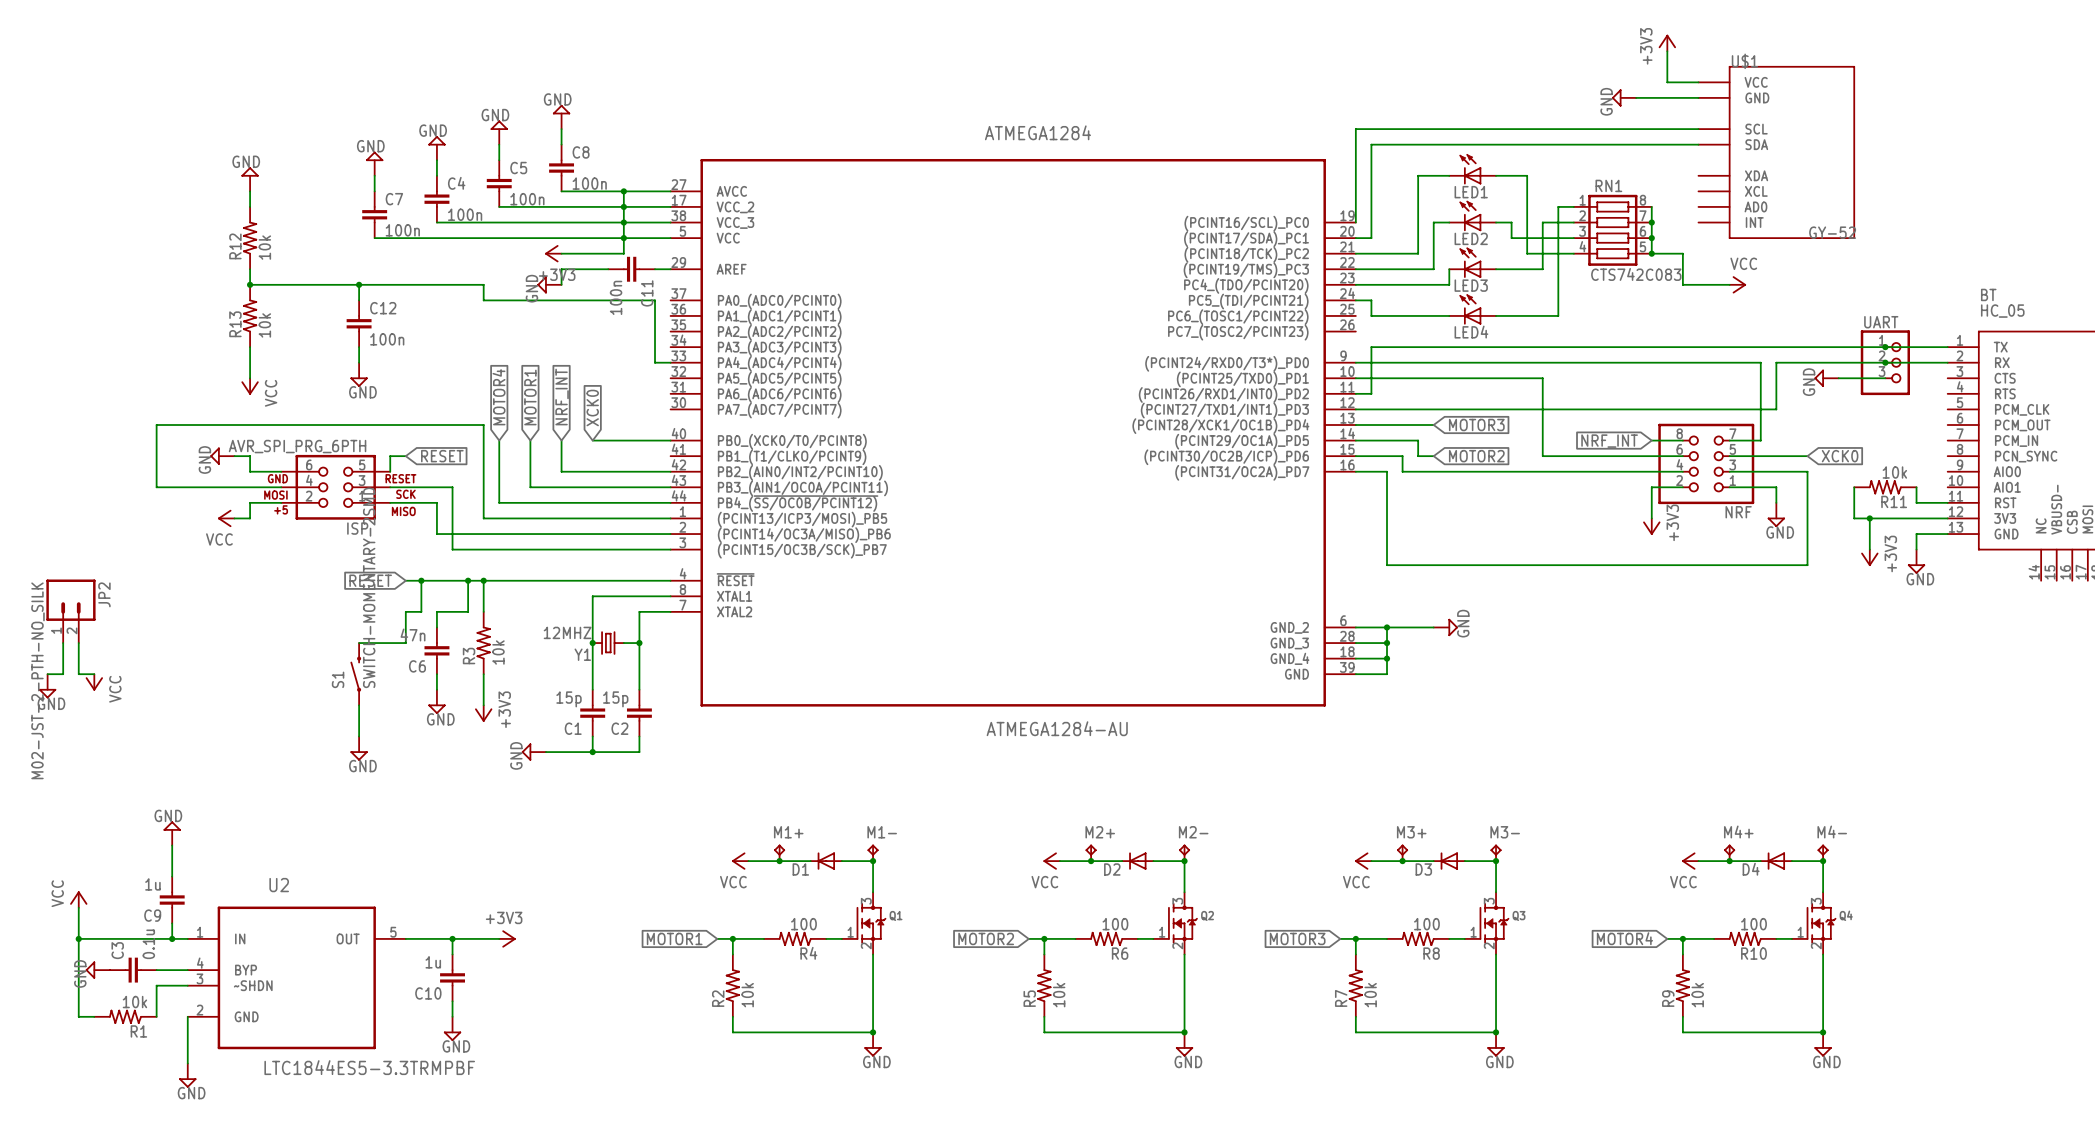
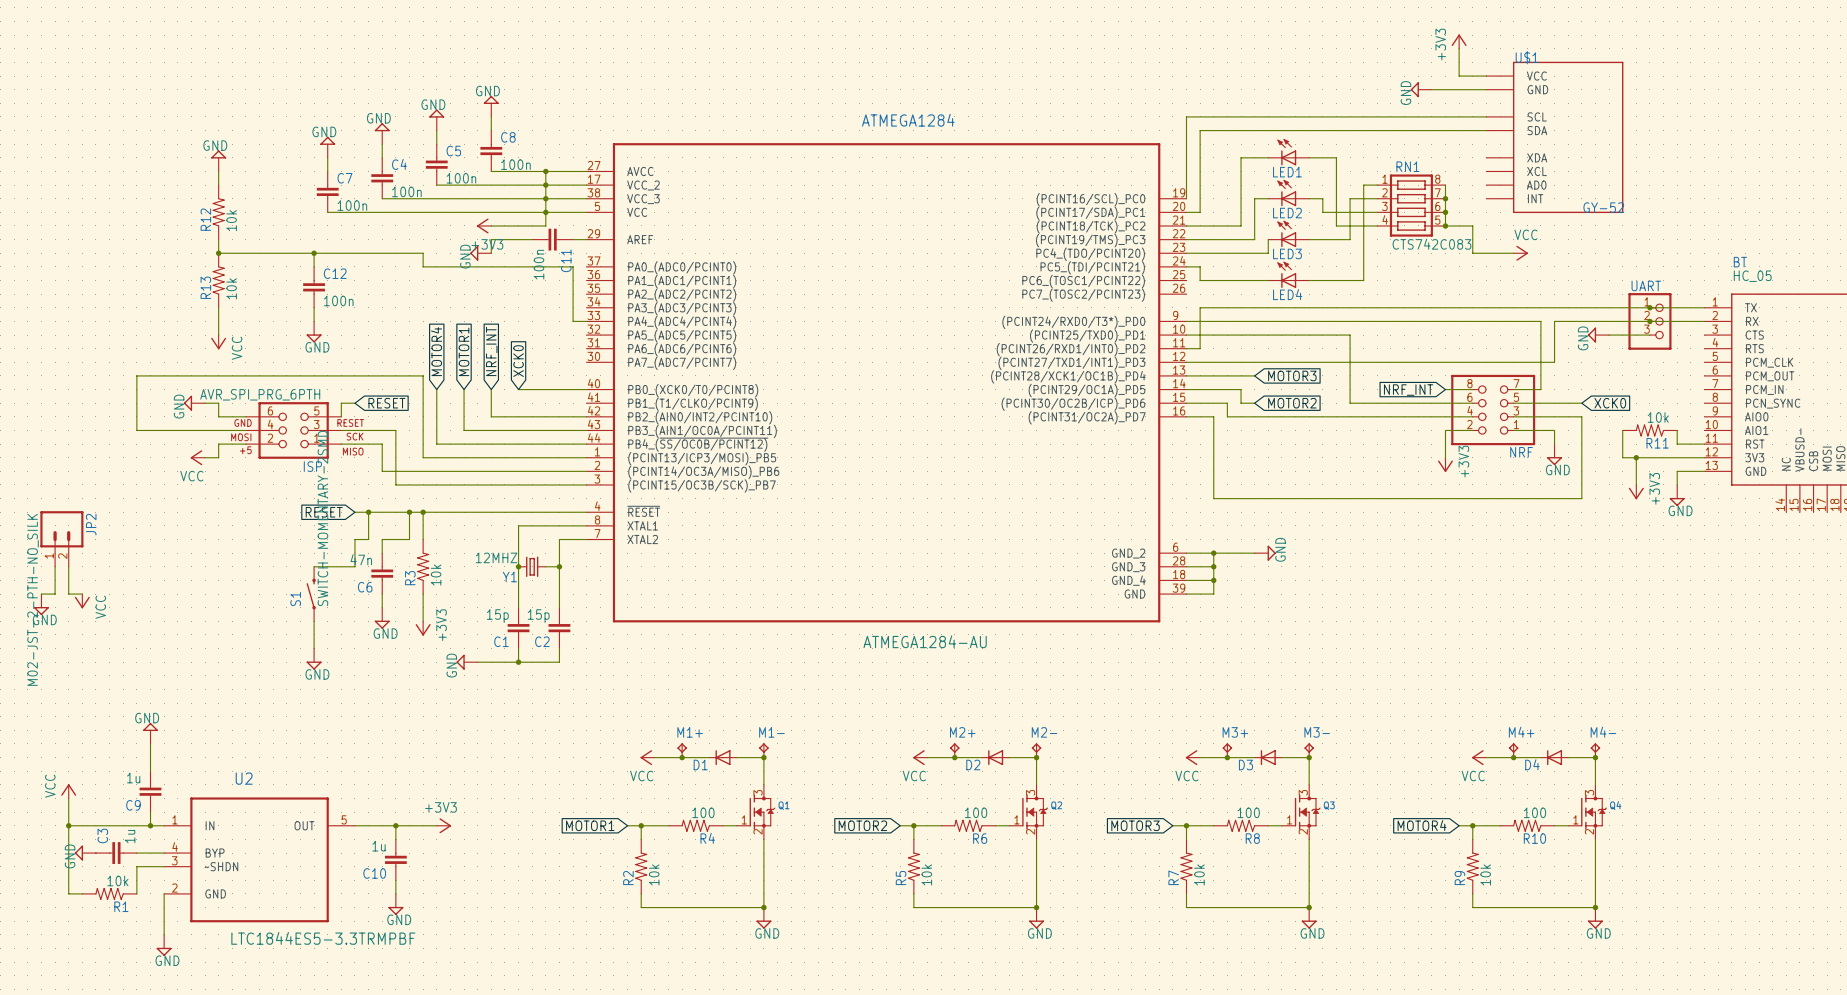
C3 value: 0.1u (148, 944) -> 1u (130, 836)

